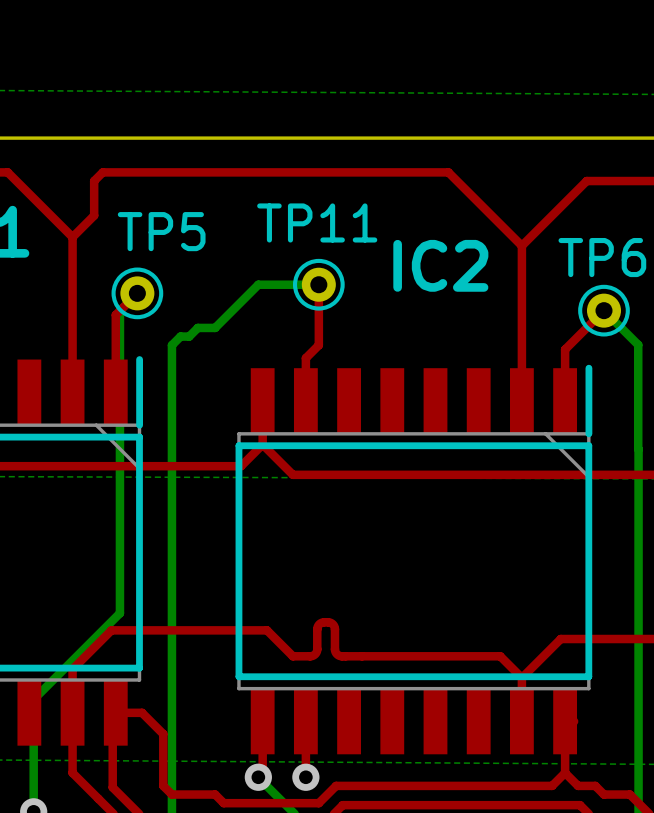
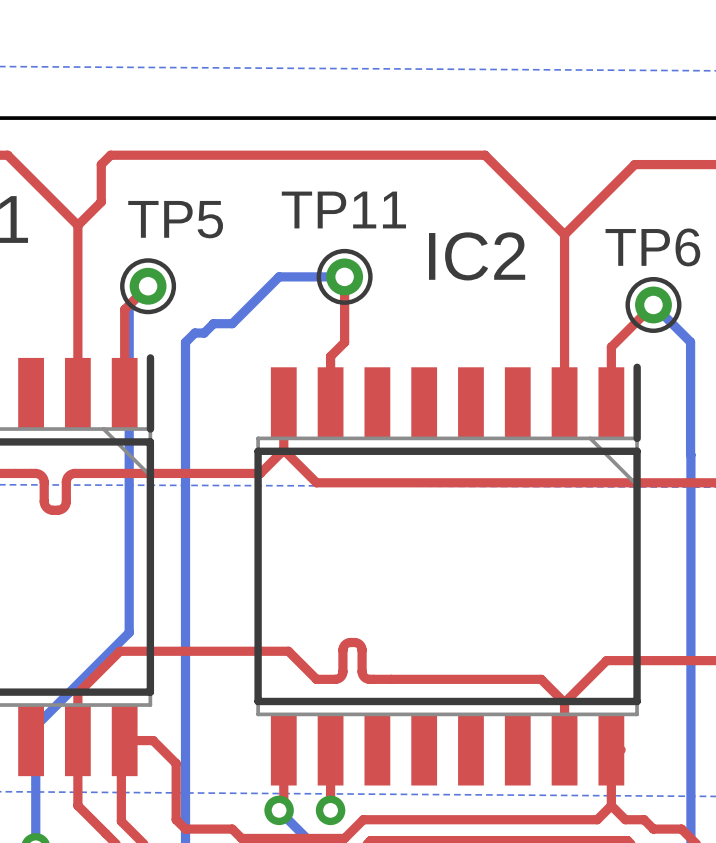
top track: (33, 466) (70, 466) -> (35, 473) (43, 478) (44, 504) (48, 508) (53, 510) (60, 509) (64, 506) (66, 479) (70, 474) (75, 473)

